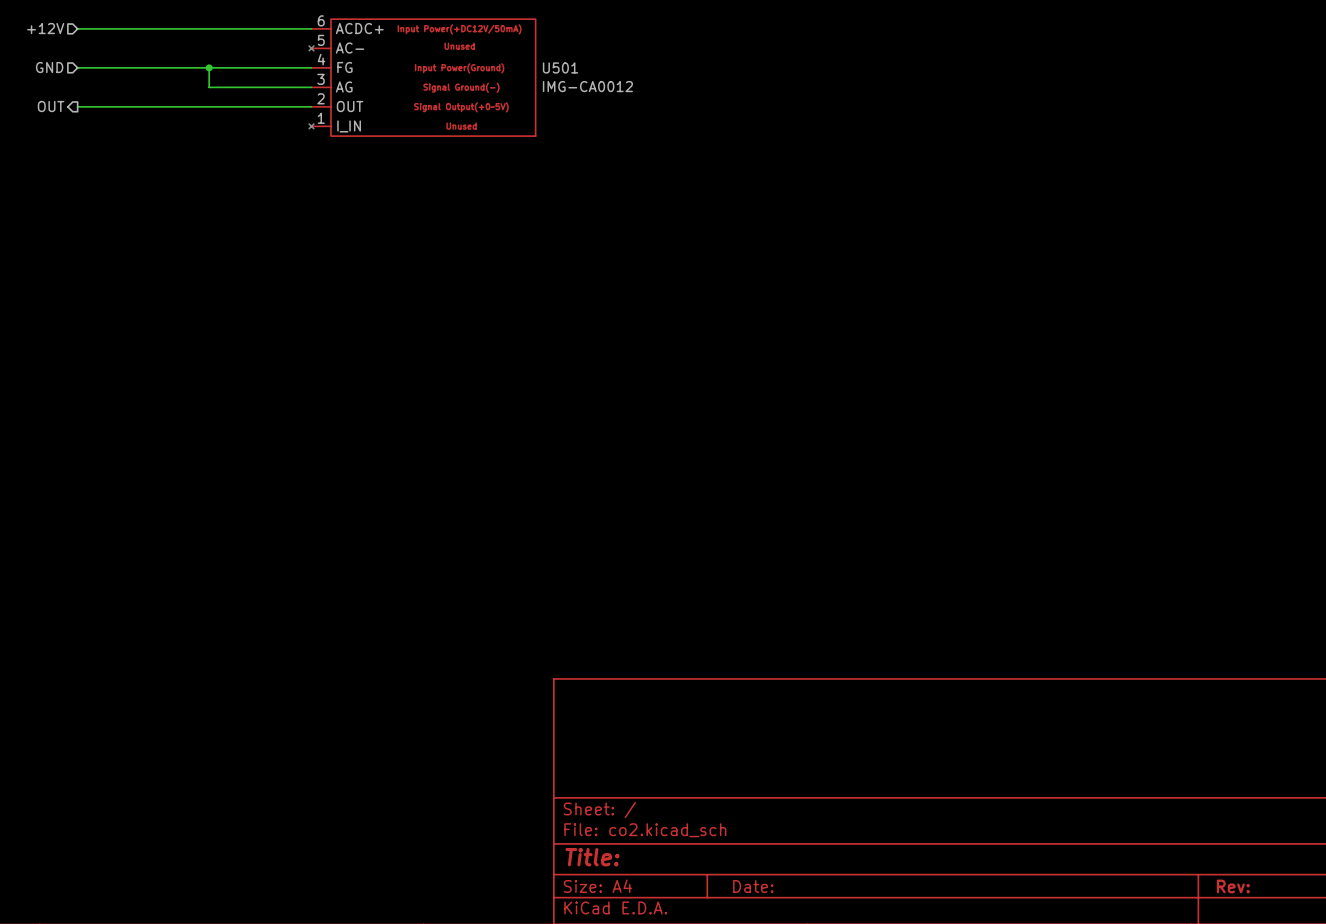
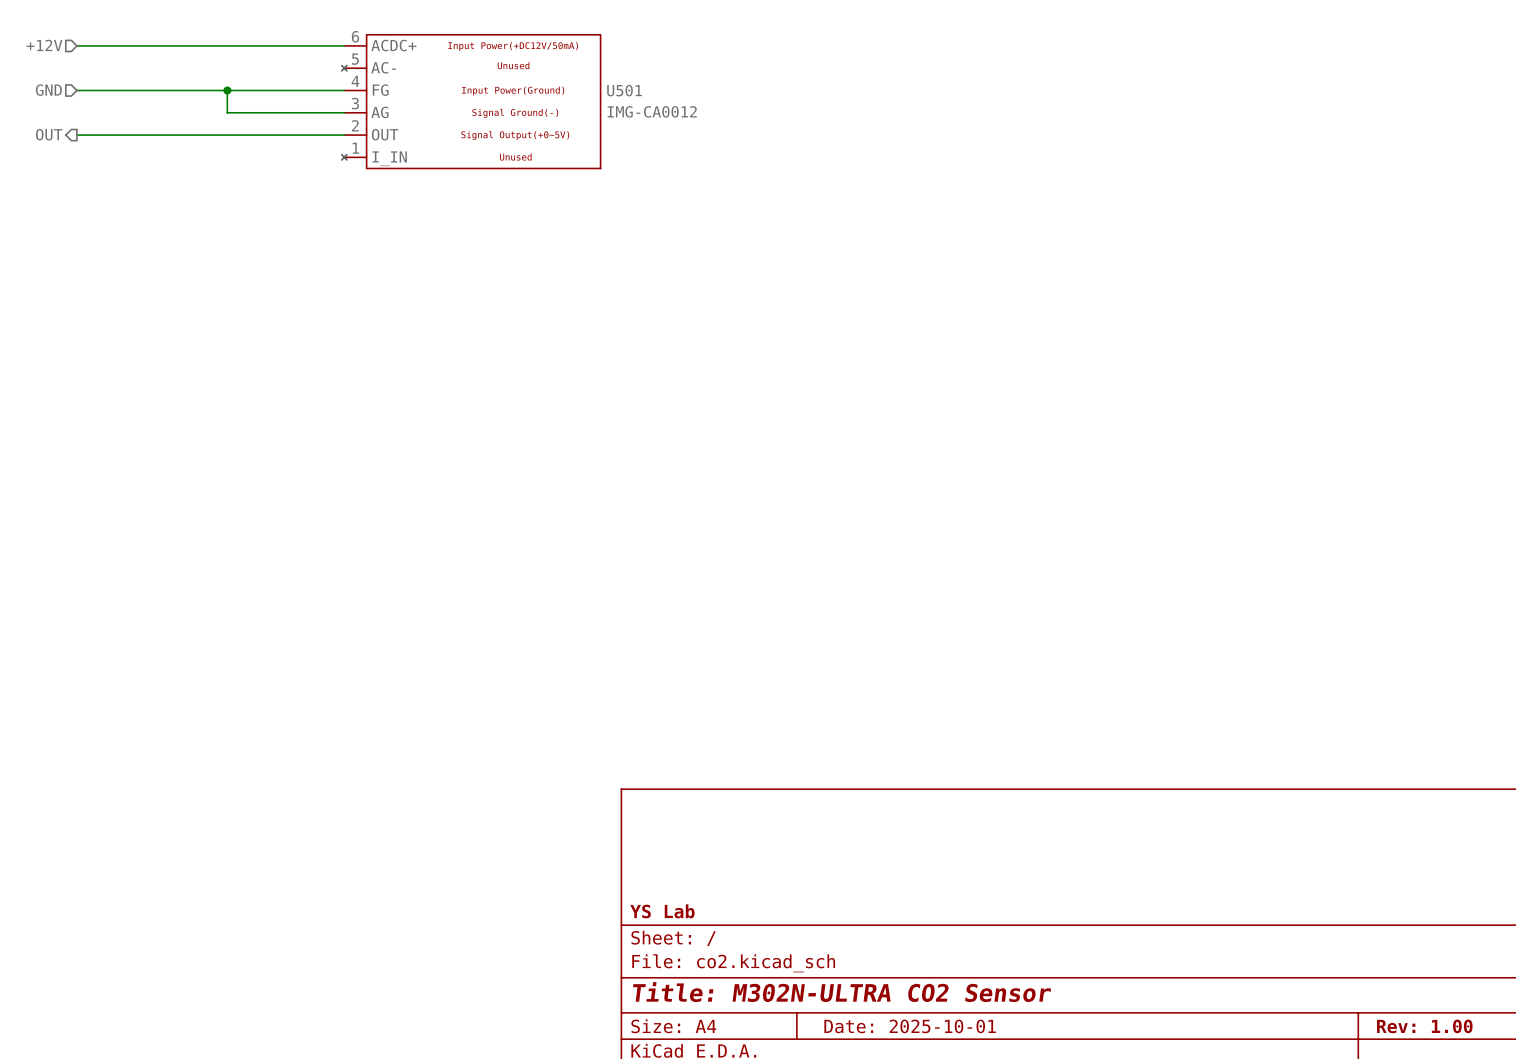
title block: none -> YS Lab (662, 911)
title block: Title: (592, 857) -> Title: M302N-ULTRA CO2 Sensor (842, 992)
title block: Date: (753, 886) -> Date: 2025-10-01 (910, 1026)
title block: Rev: (1233, 886) -> Rev: 1.00 (1424, 1026)

